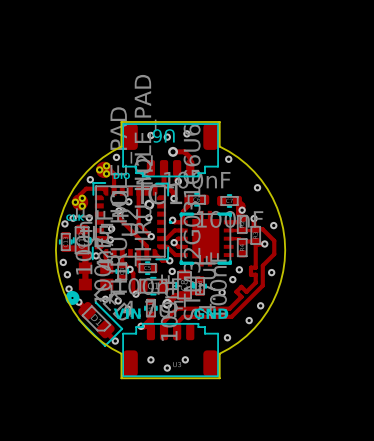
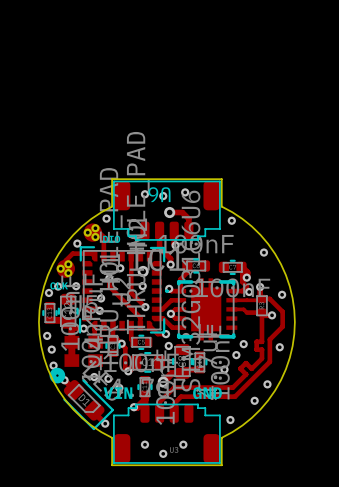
via: none -> (249, 291)
part: (242, 224) -> none
part: (242, 247) -> none

